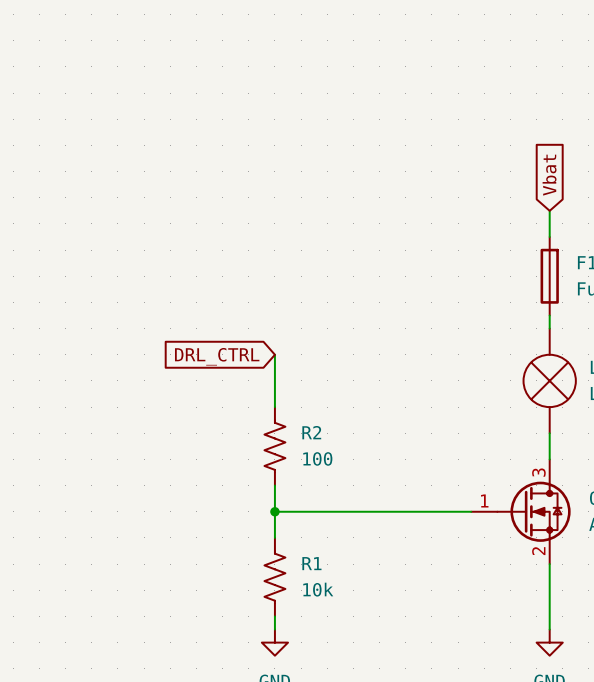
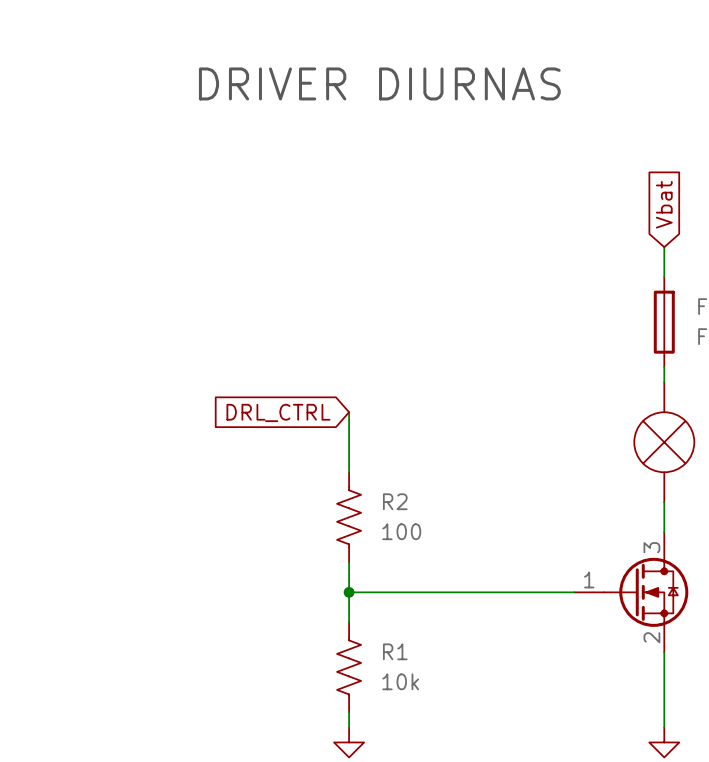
text: none -> DRIVER DIURNAS (379, 83)

